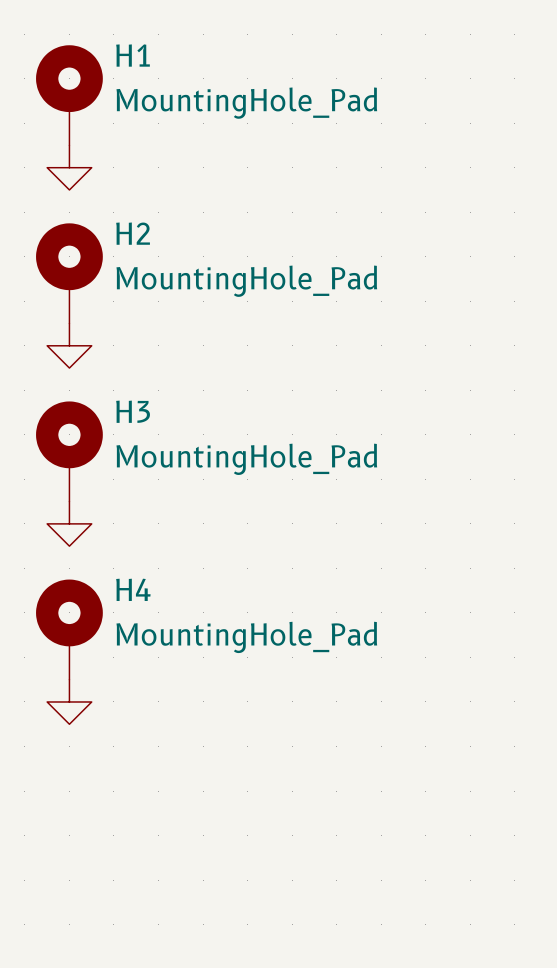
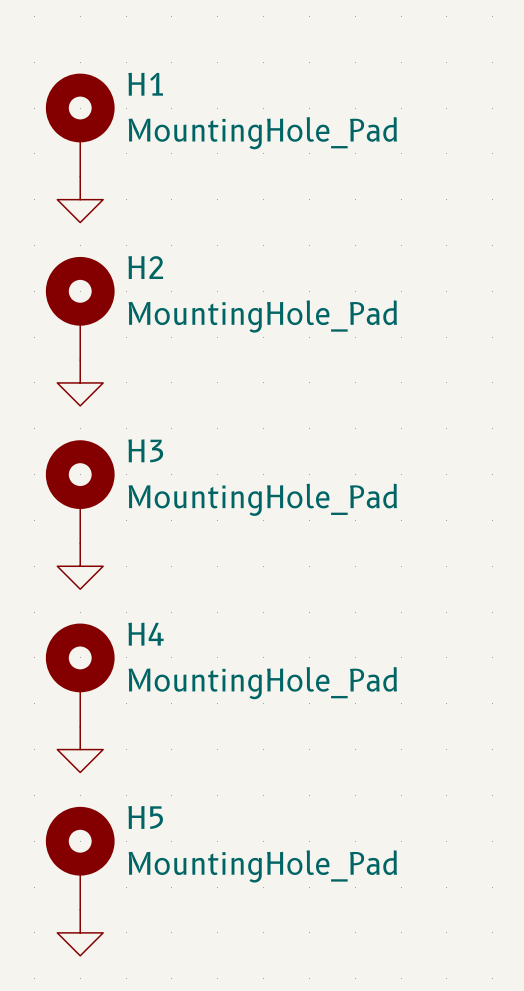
H5: none -> MountingHole_Pad (80, 858)
power symbol: none -> (80, 932)

